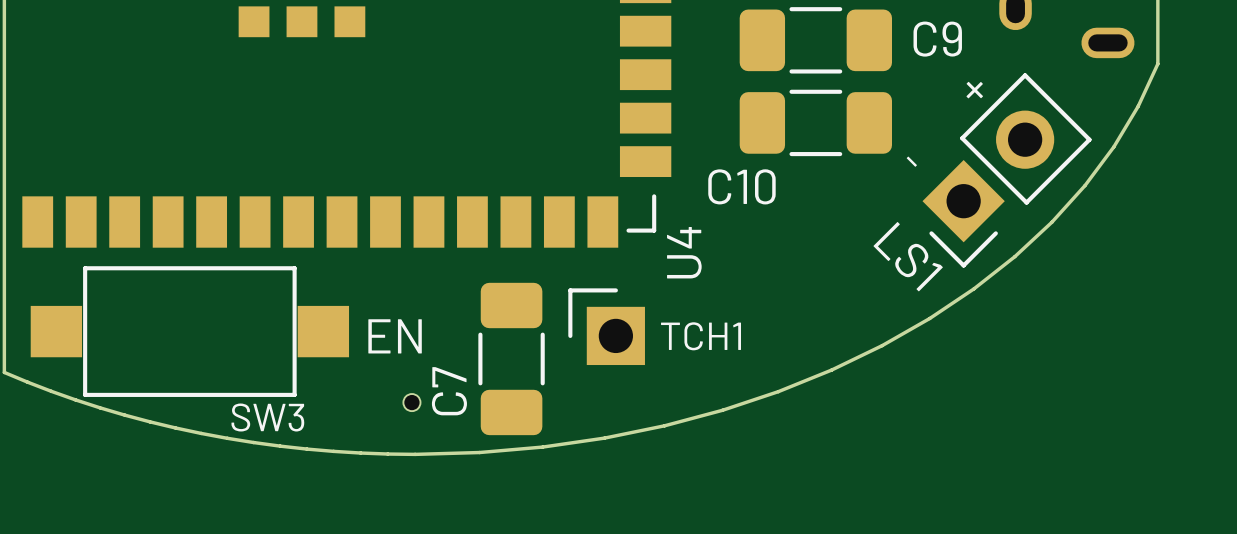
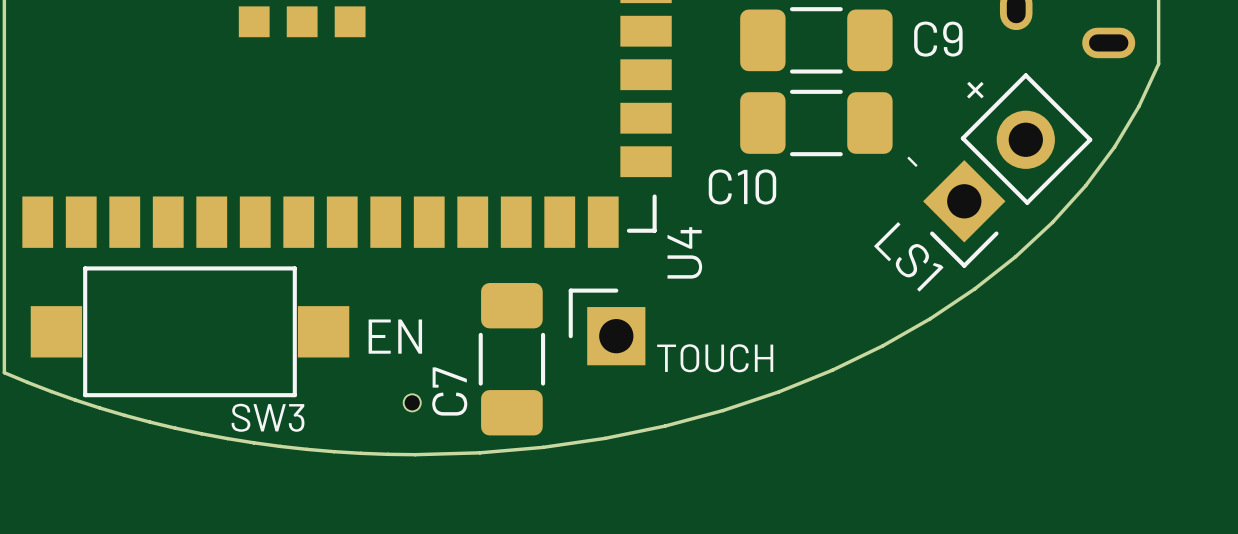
text: TCH1 (701, 336) -> TOUCH (715, 358)

